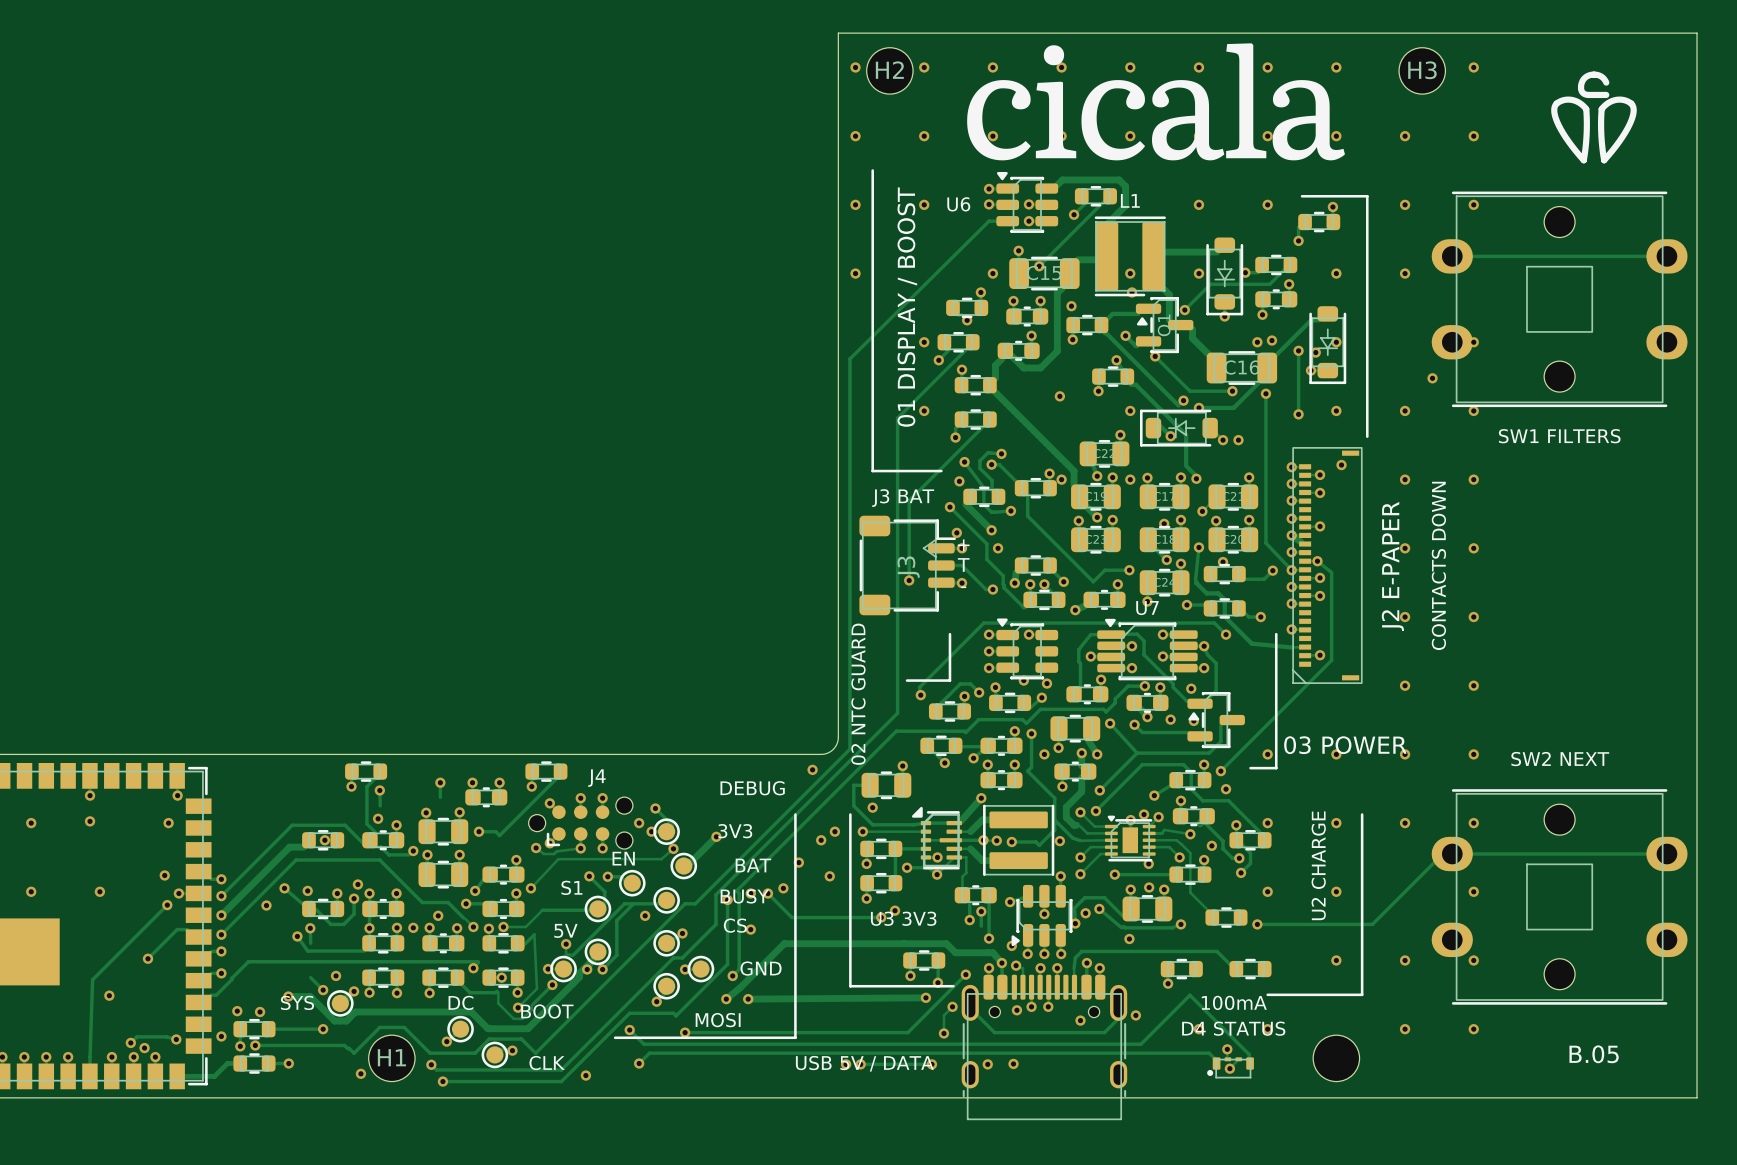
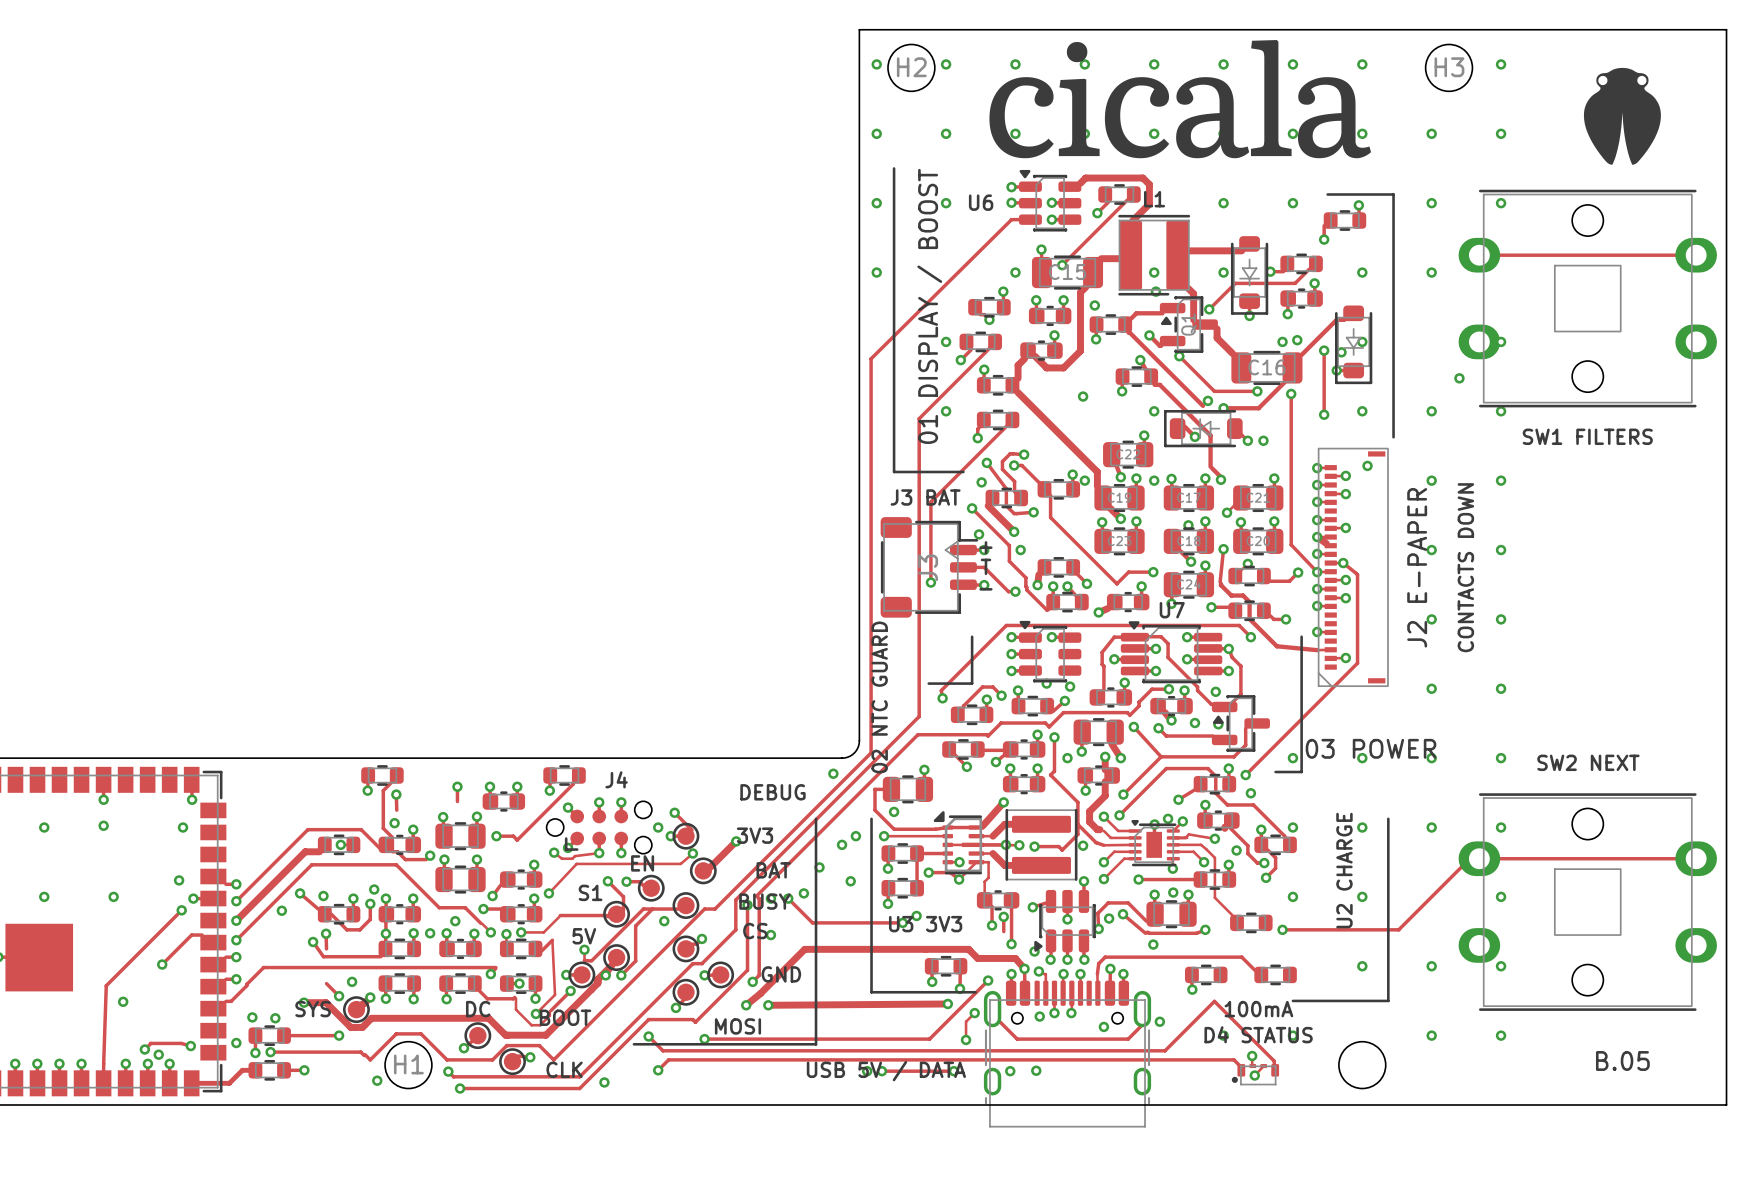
drawing: none -> [1583, 67, 1661, 165]
line: (1606, 82) (1600, 76) (1591, 74) (1583, 79) (1581, 87) (1585, 94) (1606, 94) -> none
line: (1556, 103) (1563, 100) (1571, 99) (1579, 102) (1586, 109) (1586, 133) (1583, 160) (1558, 125) (1554, 112) (1556, 103) -> none
line: (1631, 103) (1624, 100) (1616, 99) (1608, 102) (1601, 109) (1601, 133) (1604, 160) (1629, 125) (1633, 112) (1631, 103) -> none

